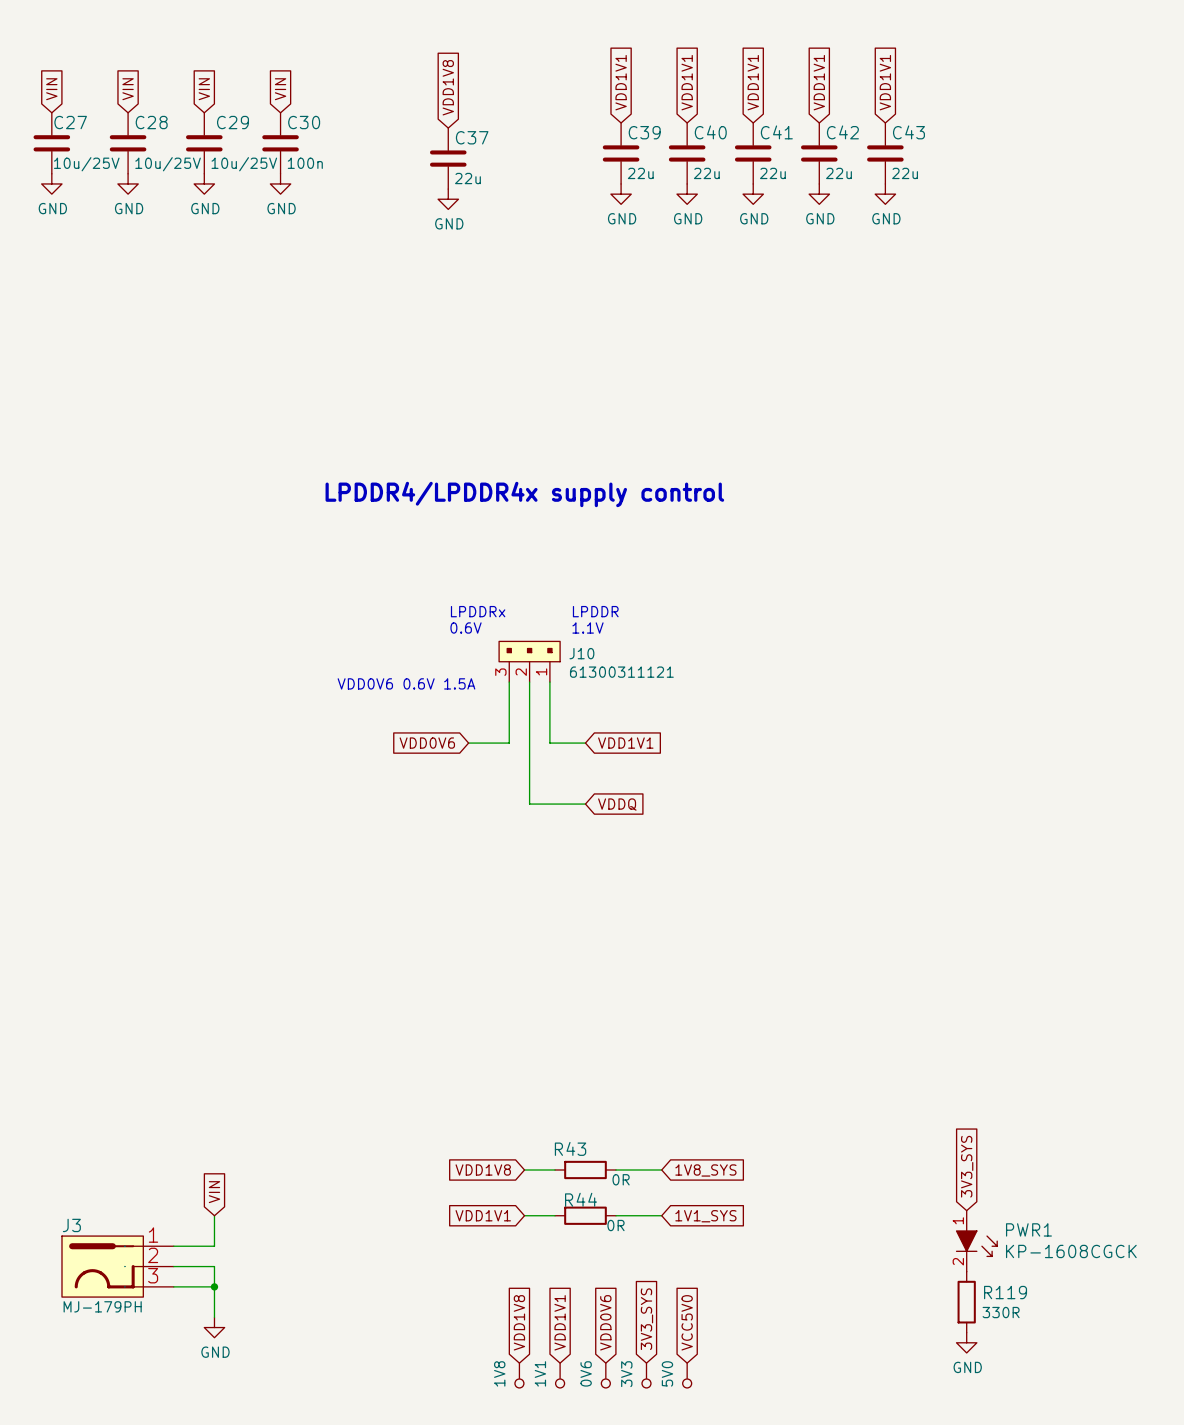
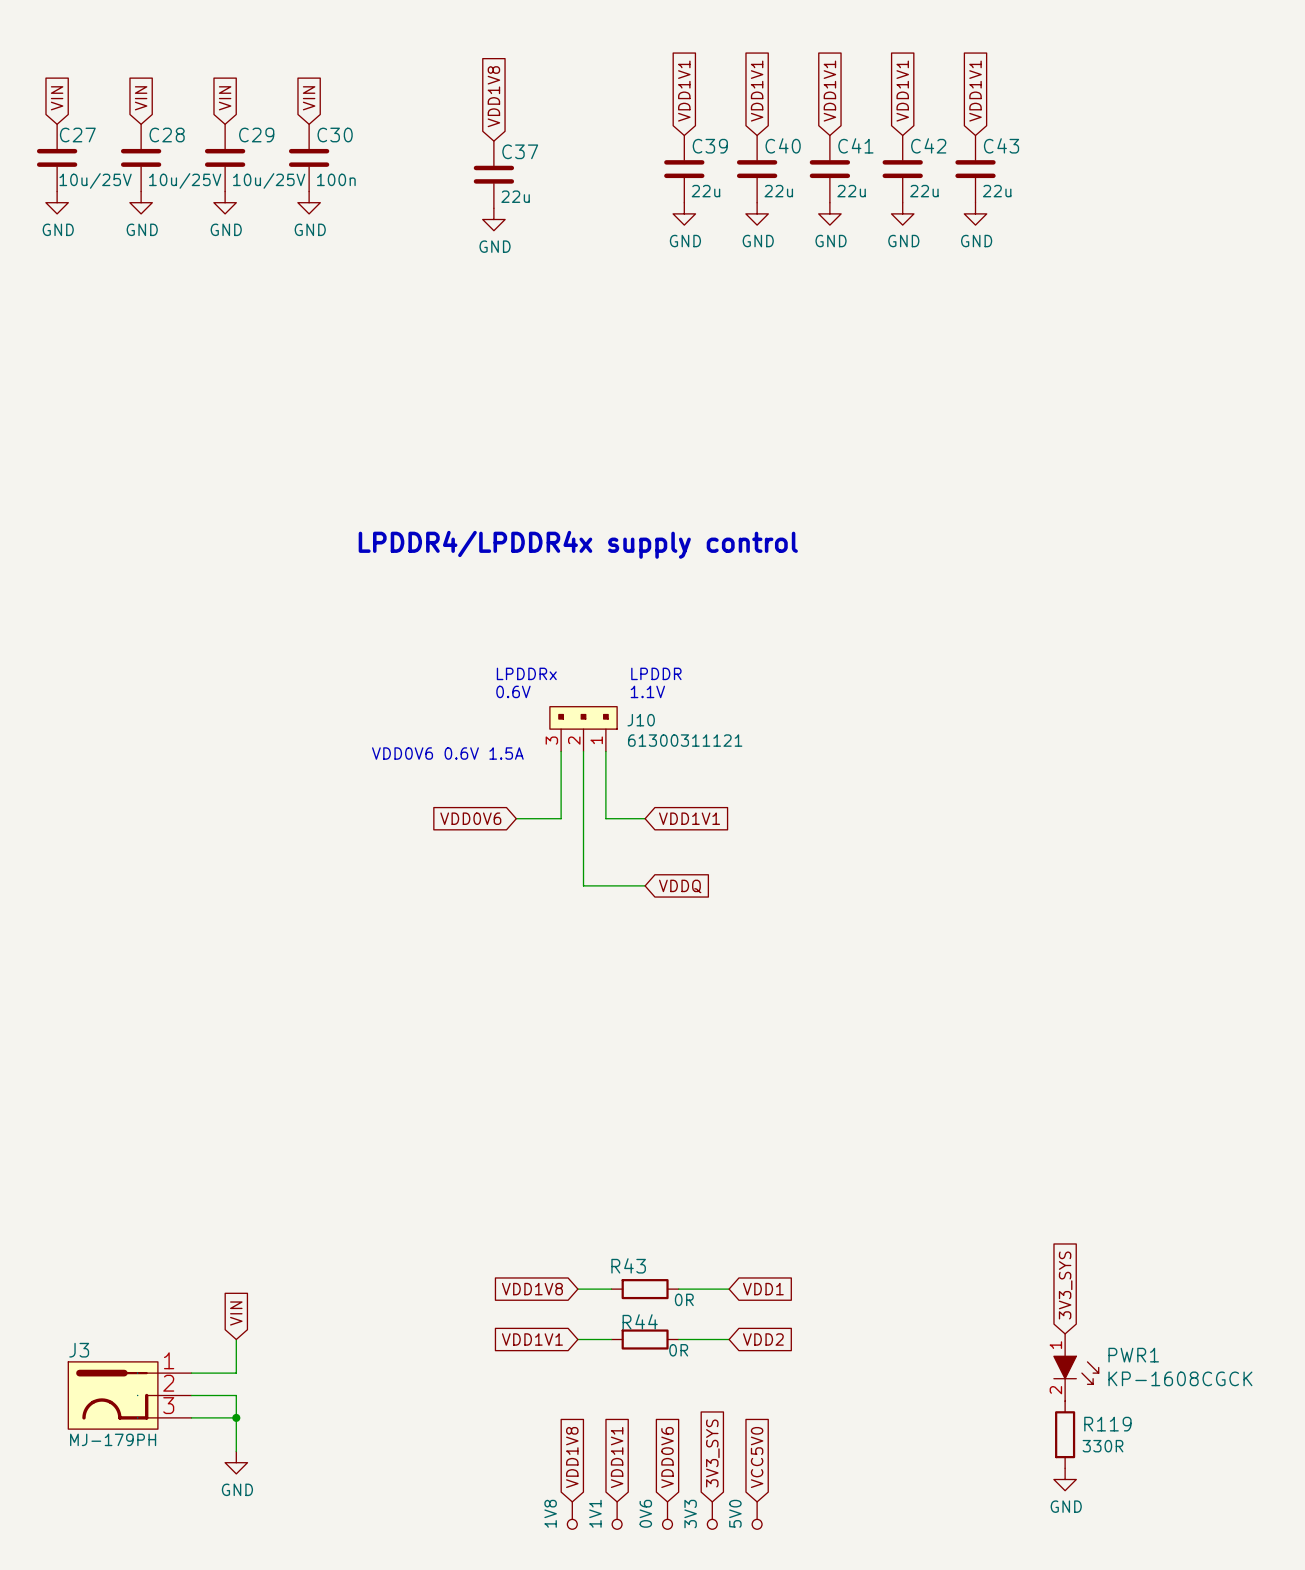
global label: 1V8_SYS (705, 1170) -> VDD1 (763, 1289)
global label: 1V1_SYS (705, 1216) -> VDD2 (763, 1339)

